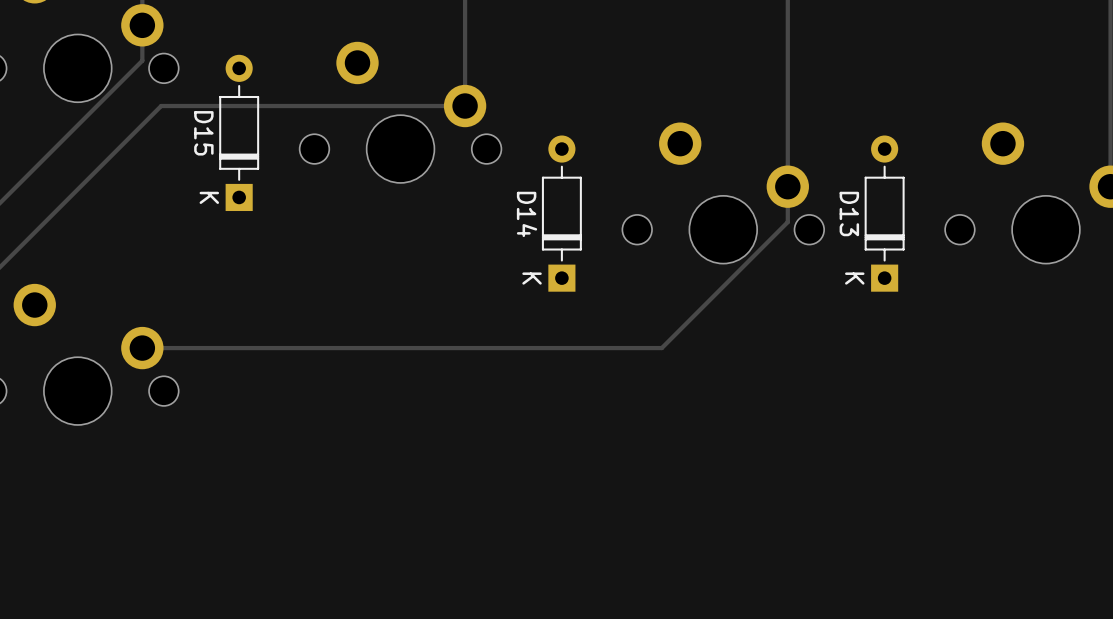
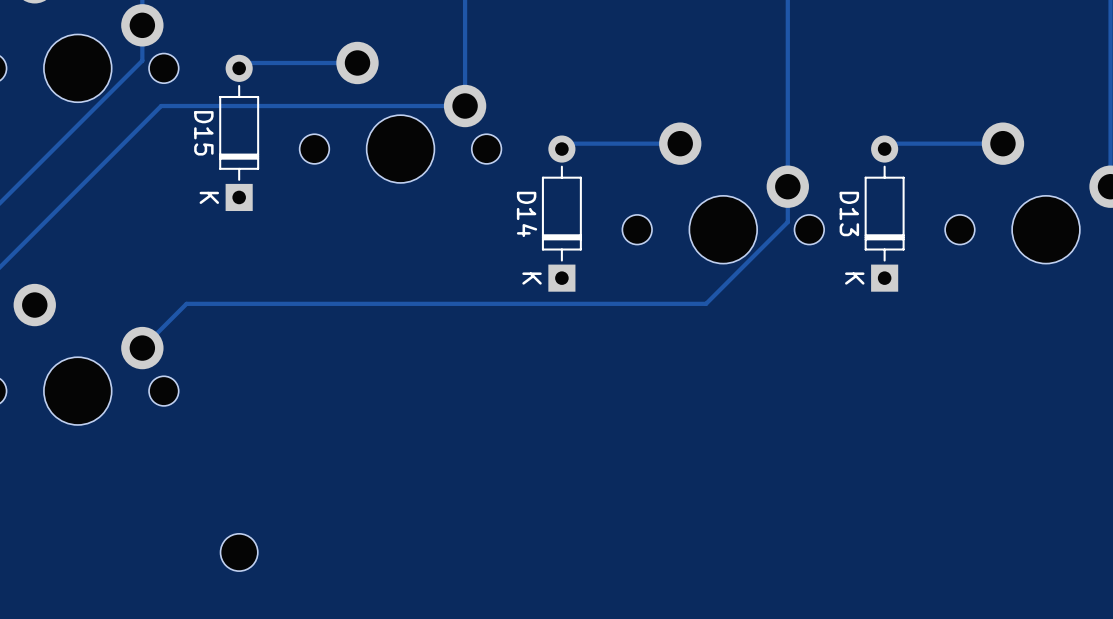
track: none -> (357, 62) (244, 62) (239, 68)
track: none -> (680, 143) (567, 143) (561, 149)
track: none -> (1002, 143) (890, 143) (884, 149)
track: (706, 303) (661, 348) (142, 348) -> (706, 303) (186, 303) (142, 348)
part: none -> (239, 552)

